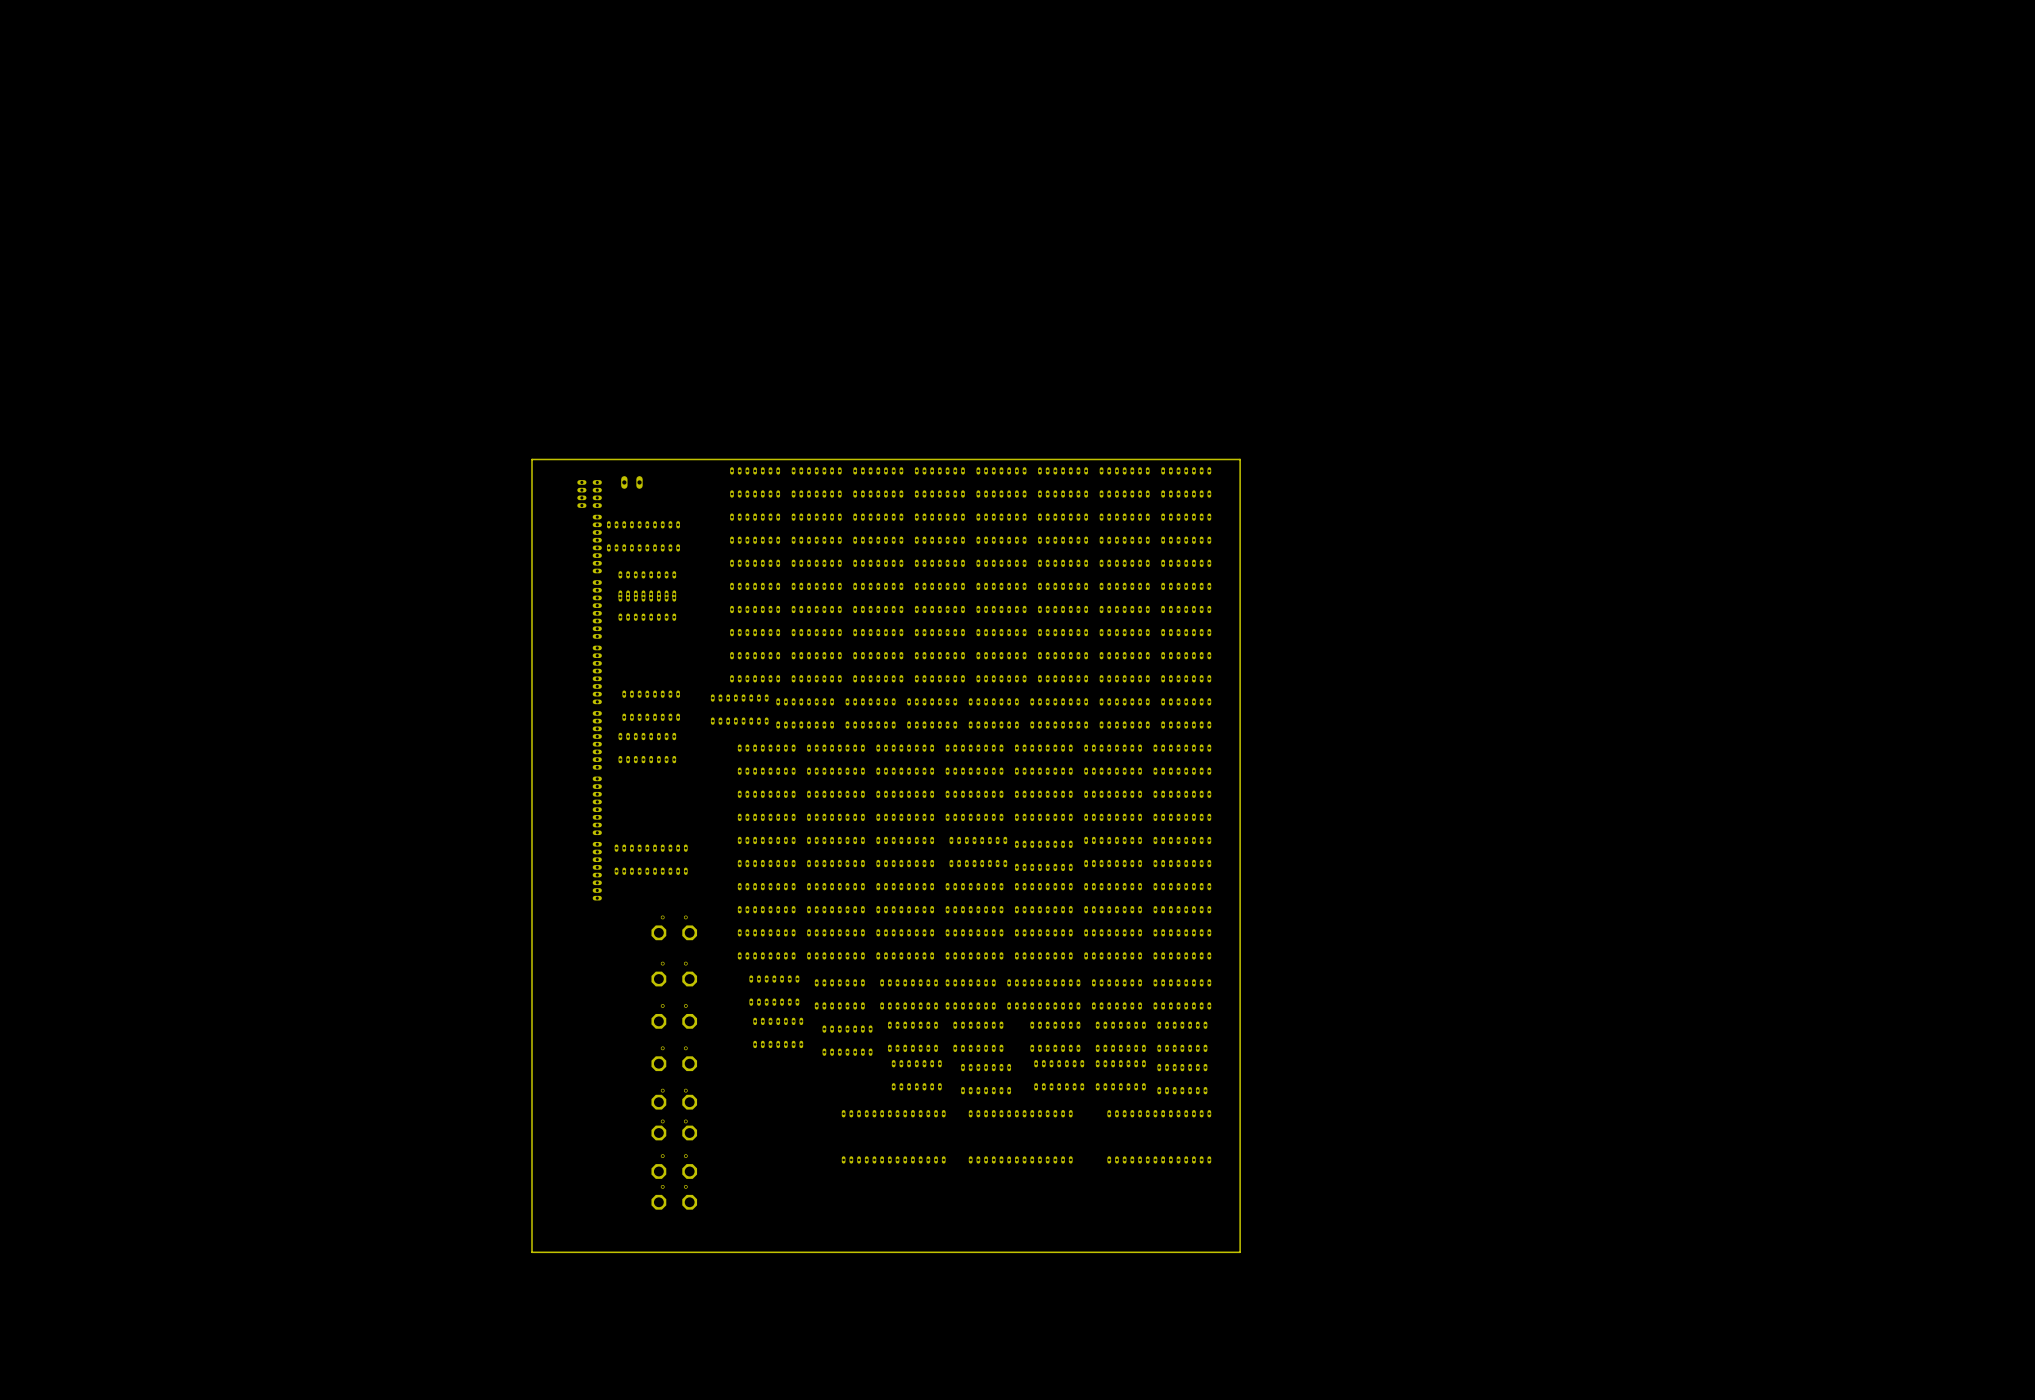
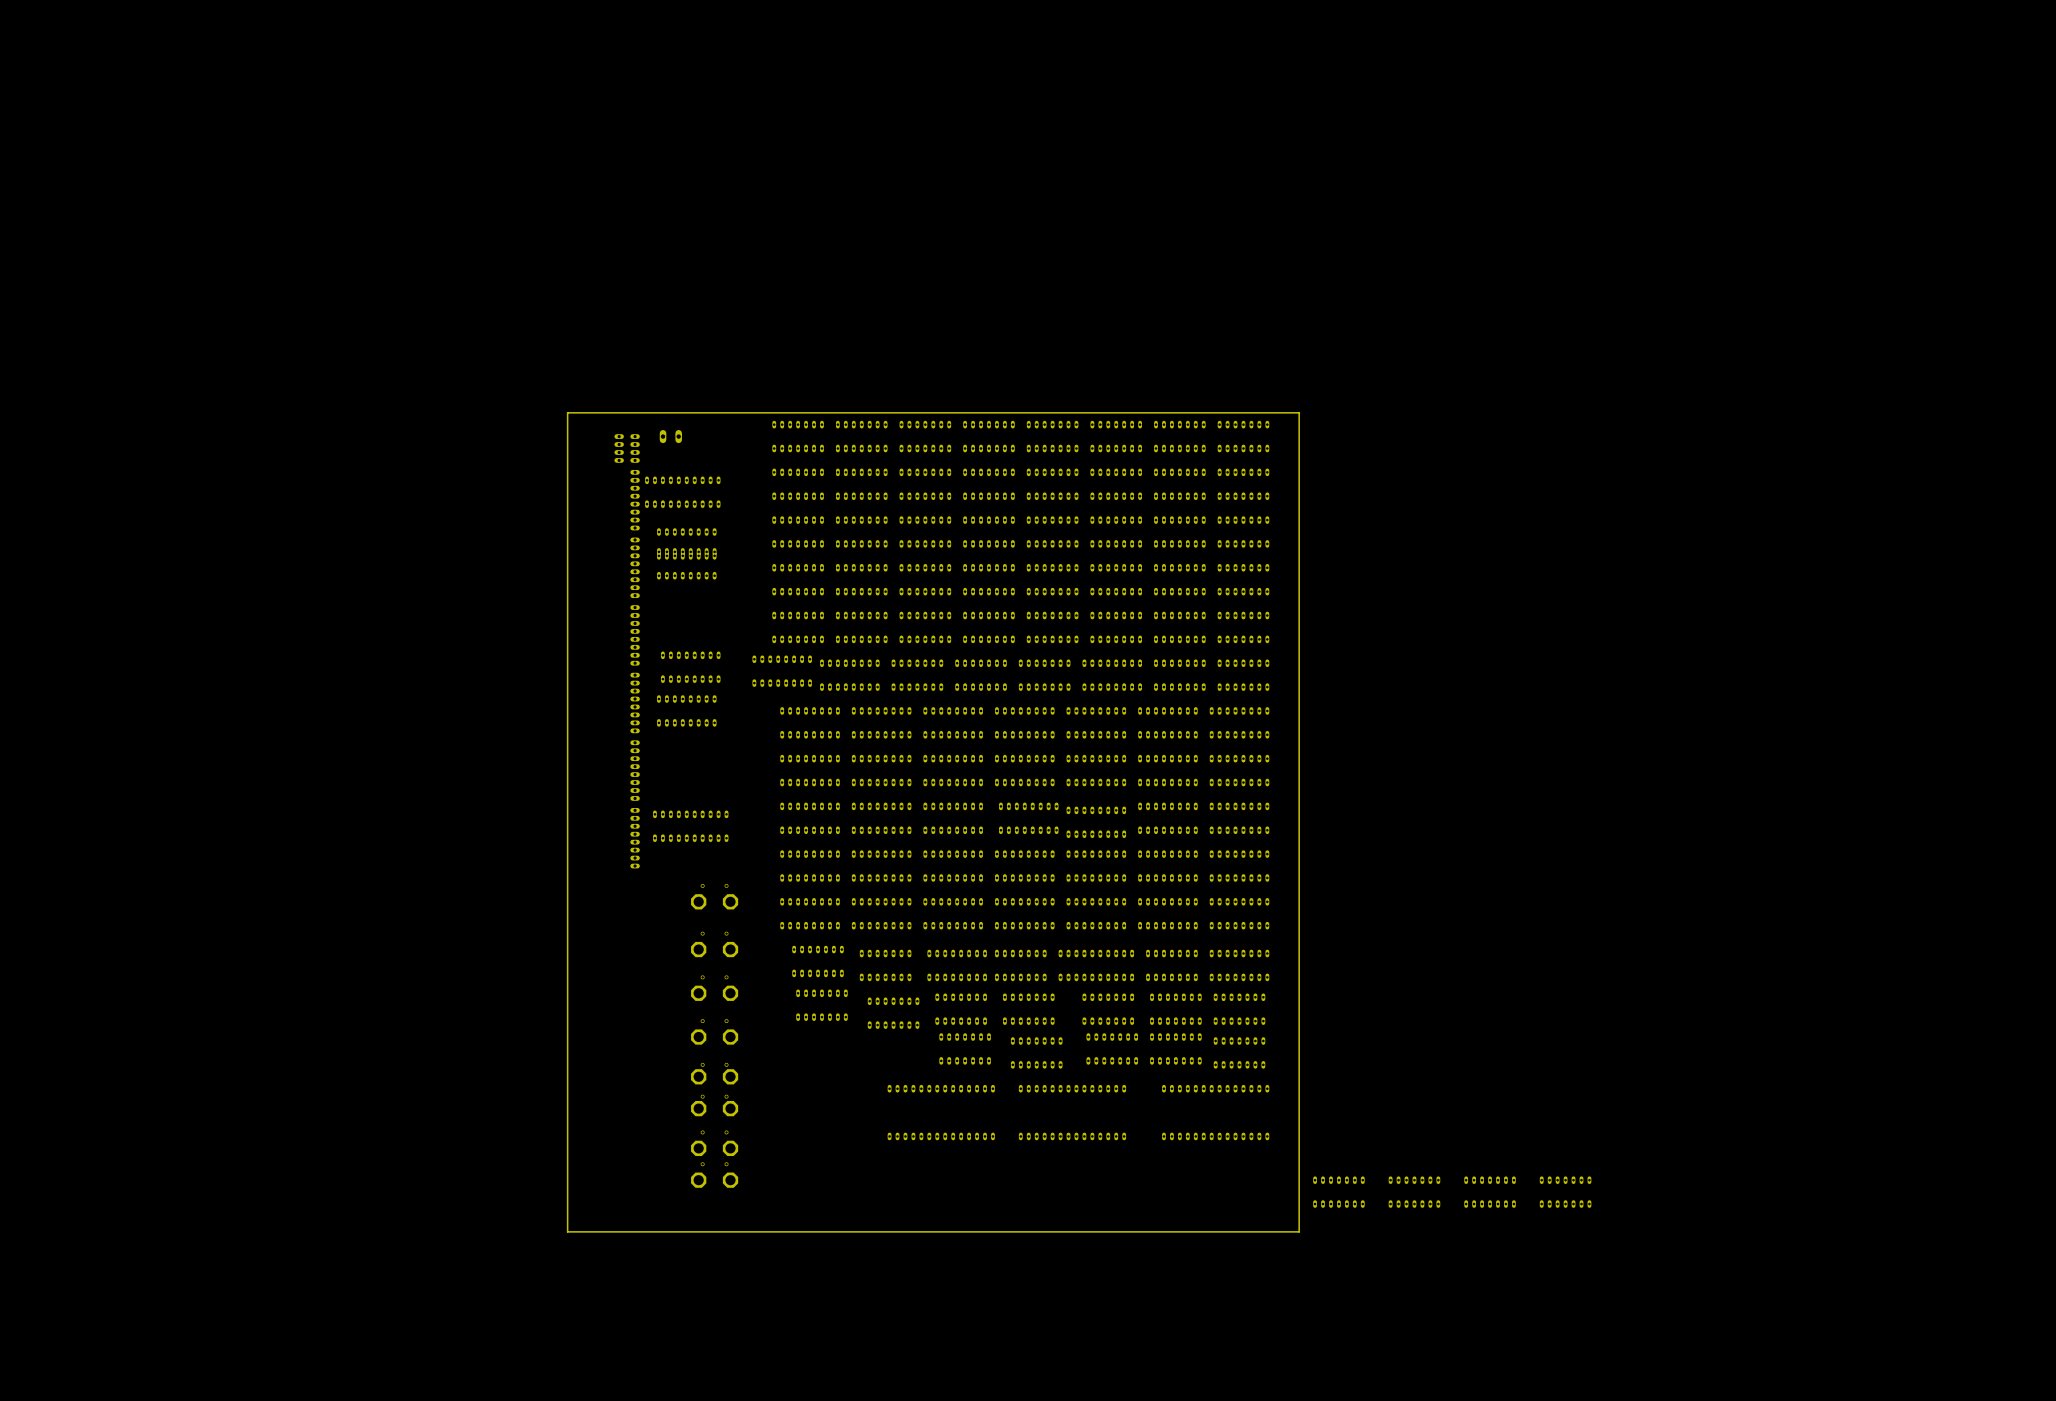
part: none -> (1338, 1192)
part: none -> (1414, 1192)
part: none -> (1490, 1192)
part: none -> (1565, 1192)

